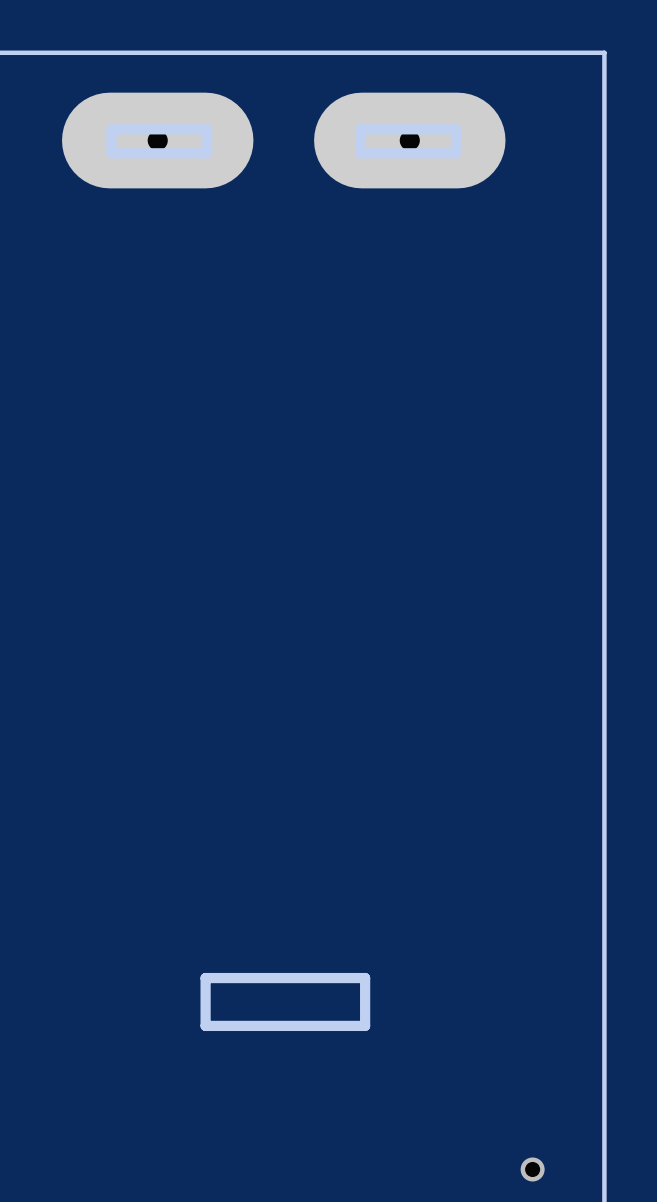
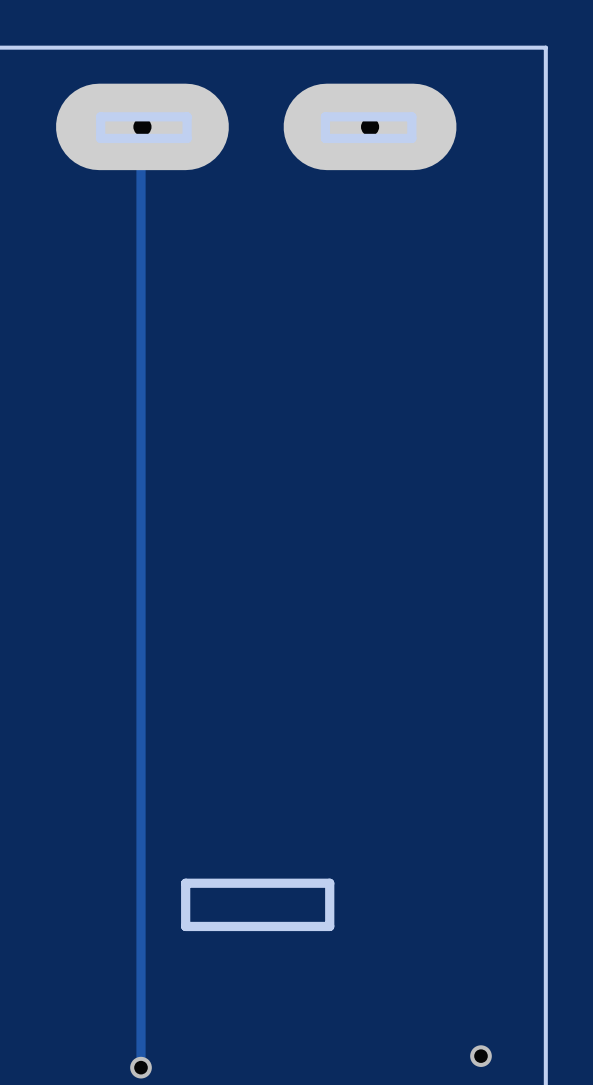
track: none -> (142, 126) (141, 1067)
via: none -> (141, 1067)

